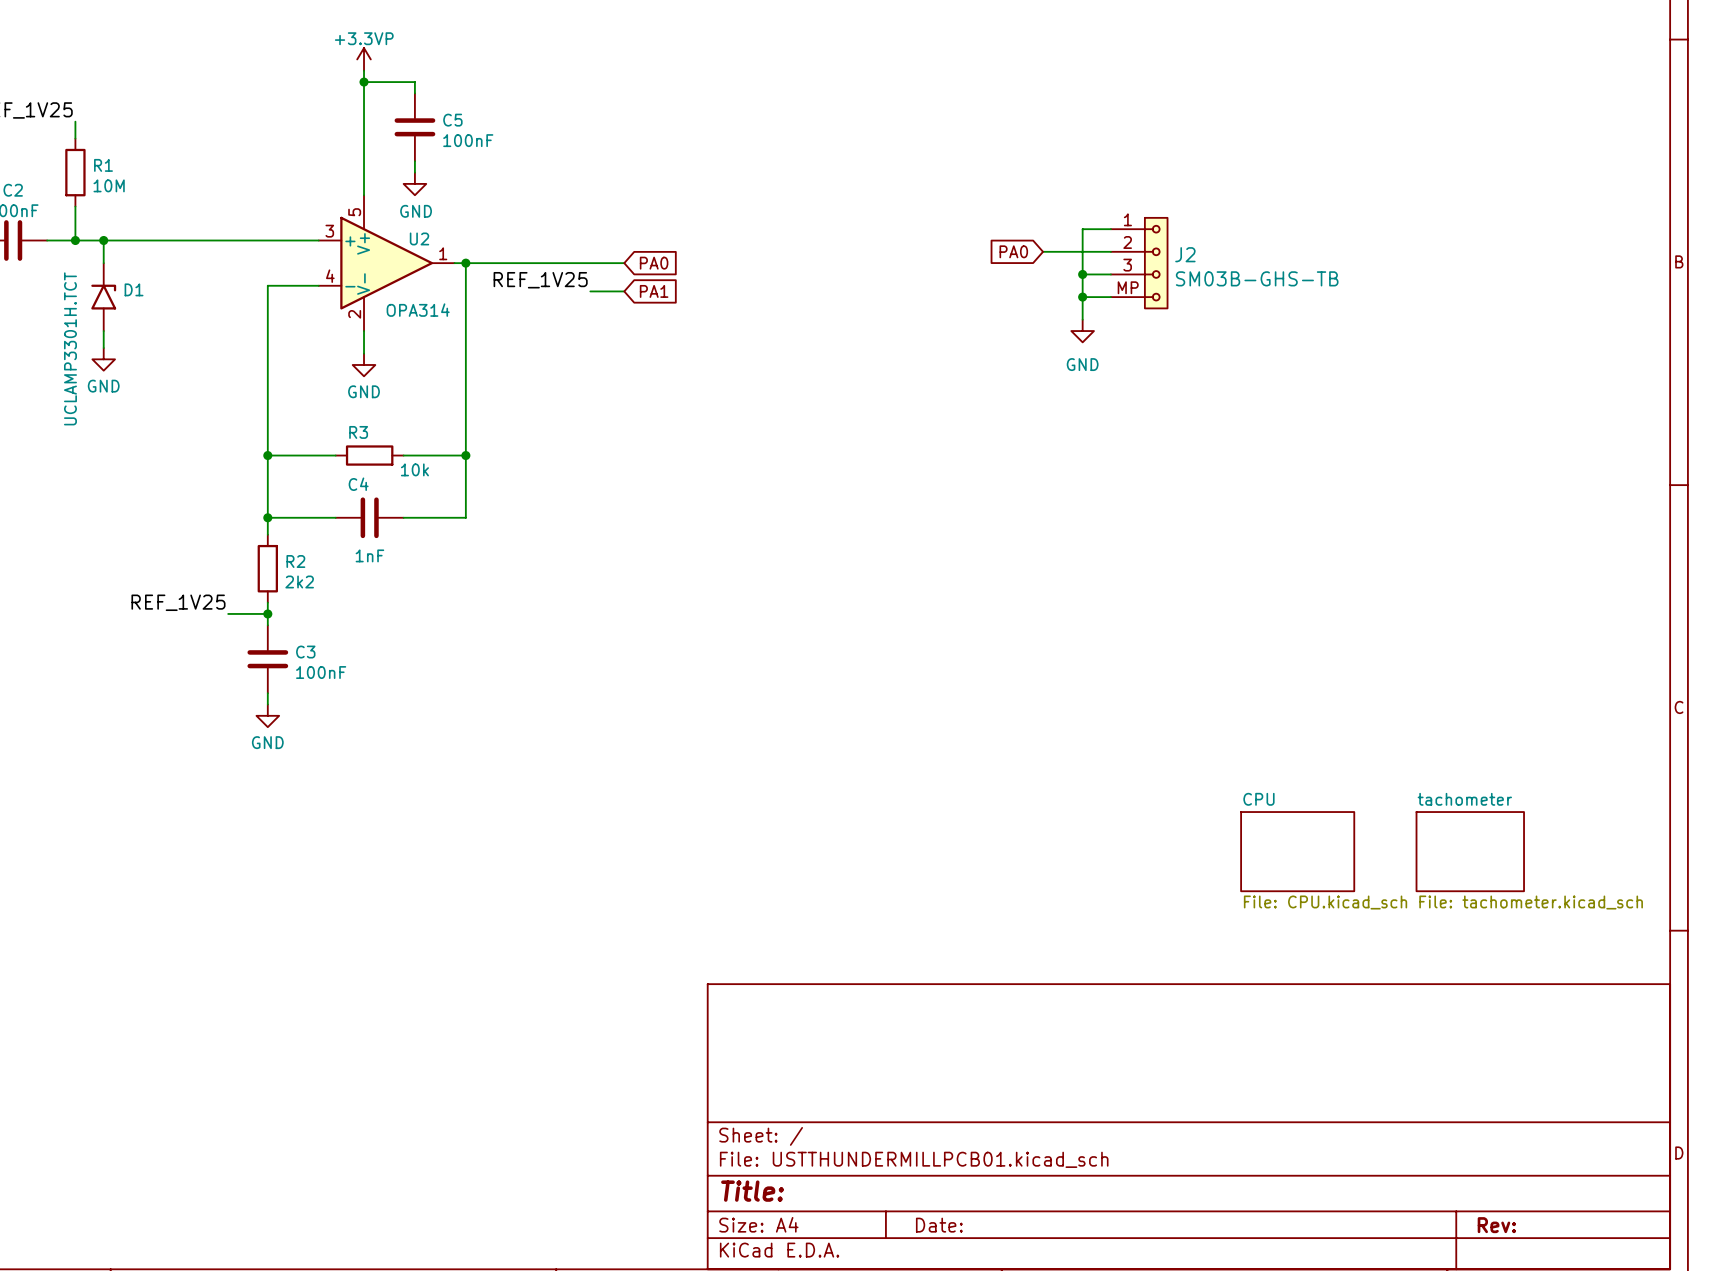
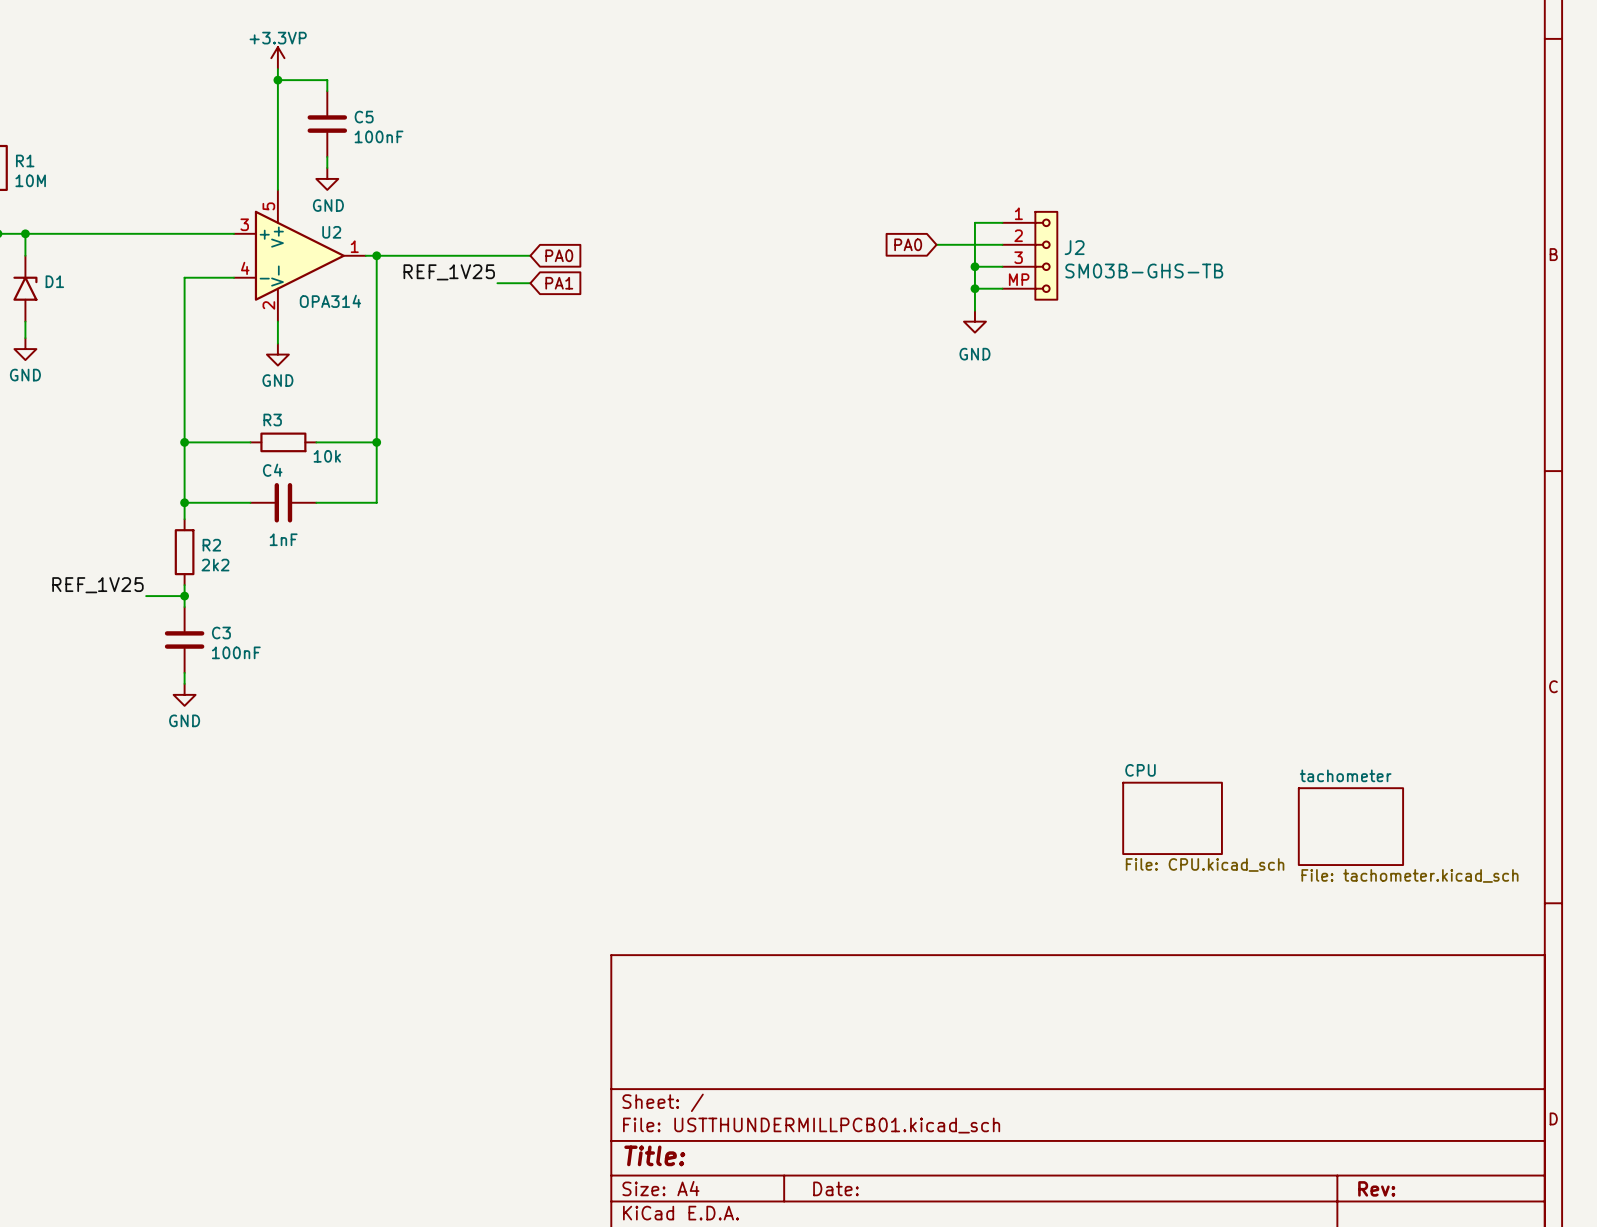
sheet CPU: none -> File: CPU.kicad_sch (1172, 818)
sheet CPU: File: CPU.kicad_sch (1297, 851) -> none

